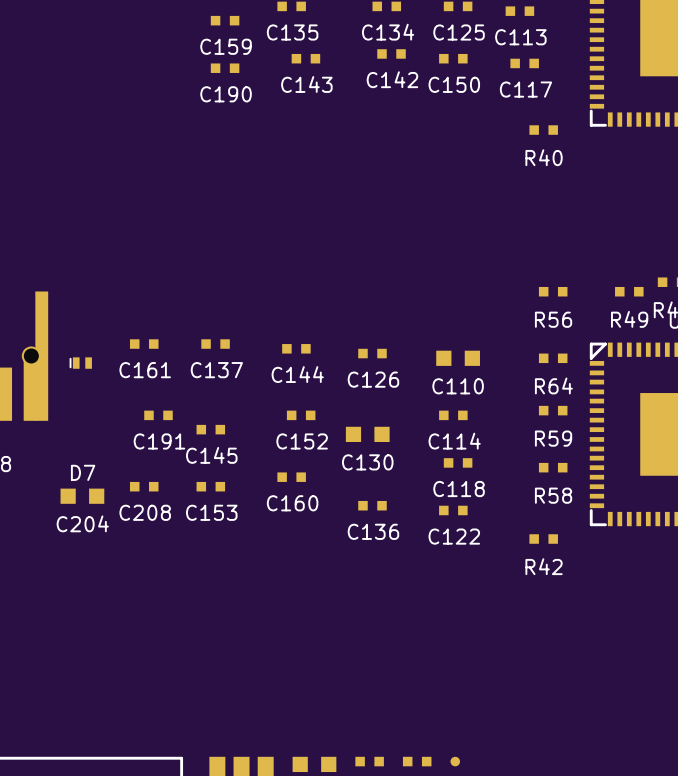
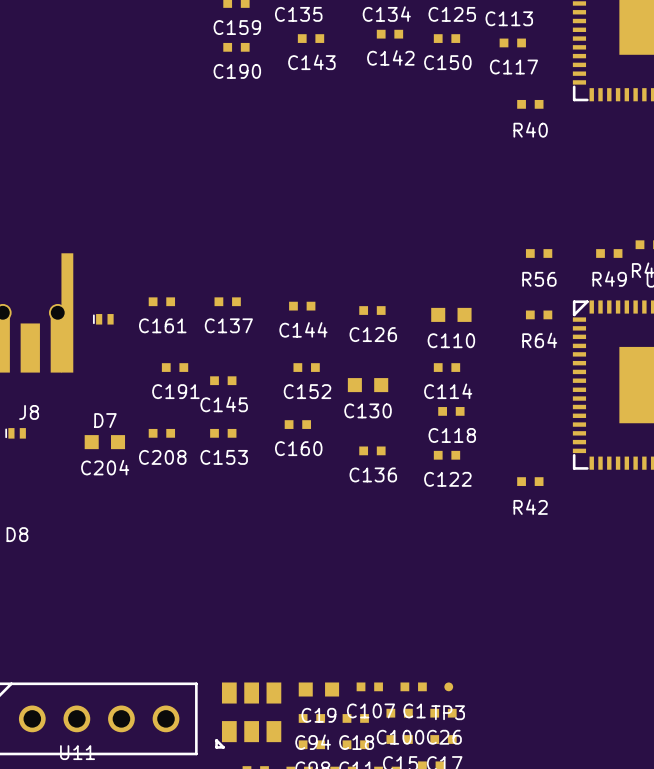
R59: (553, 410) -> none
R58: (553, 467) -> none

